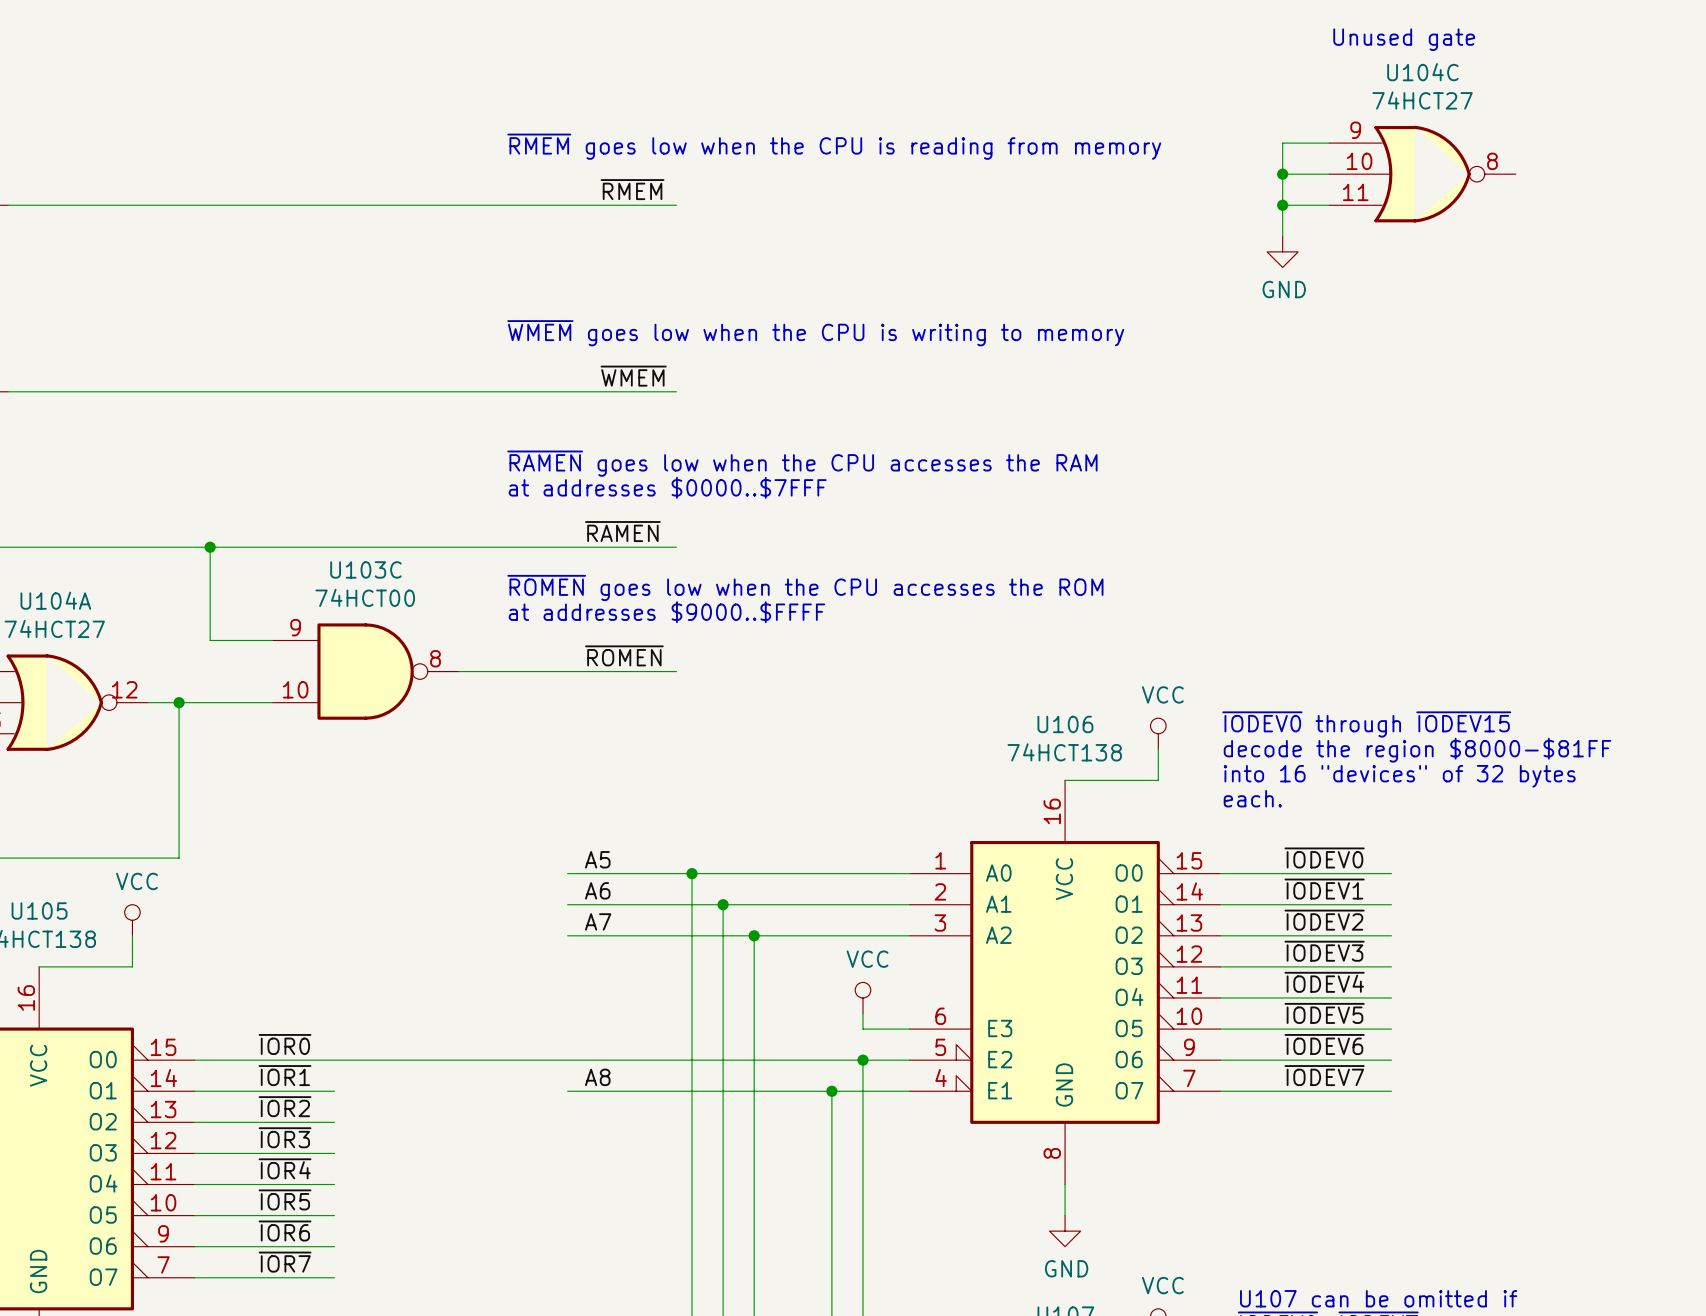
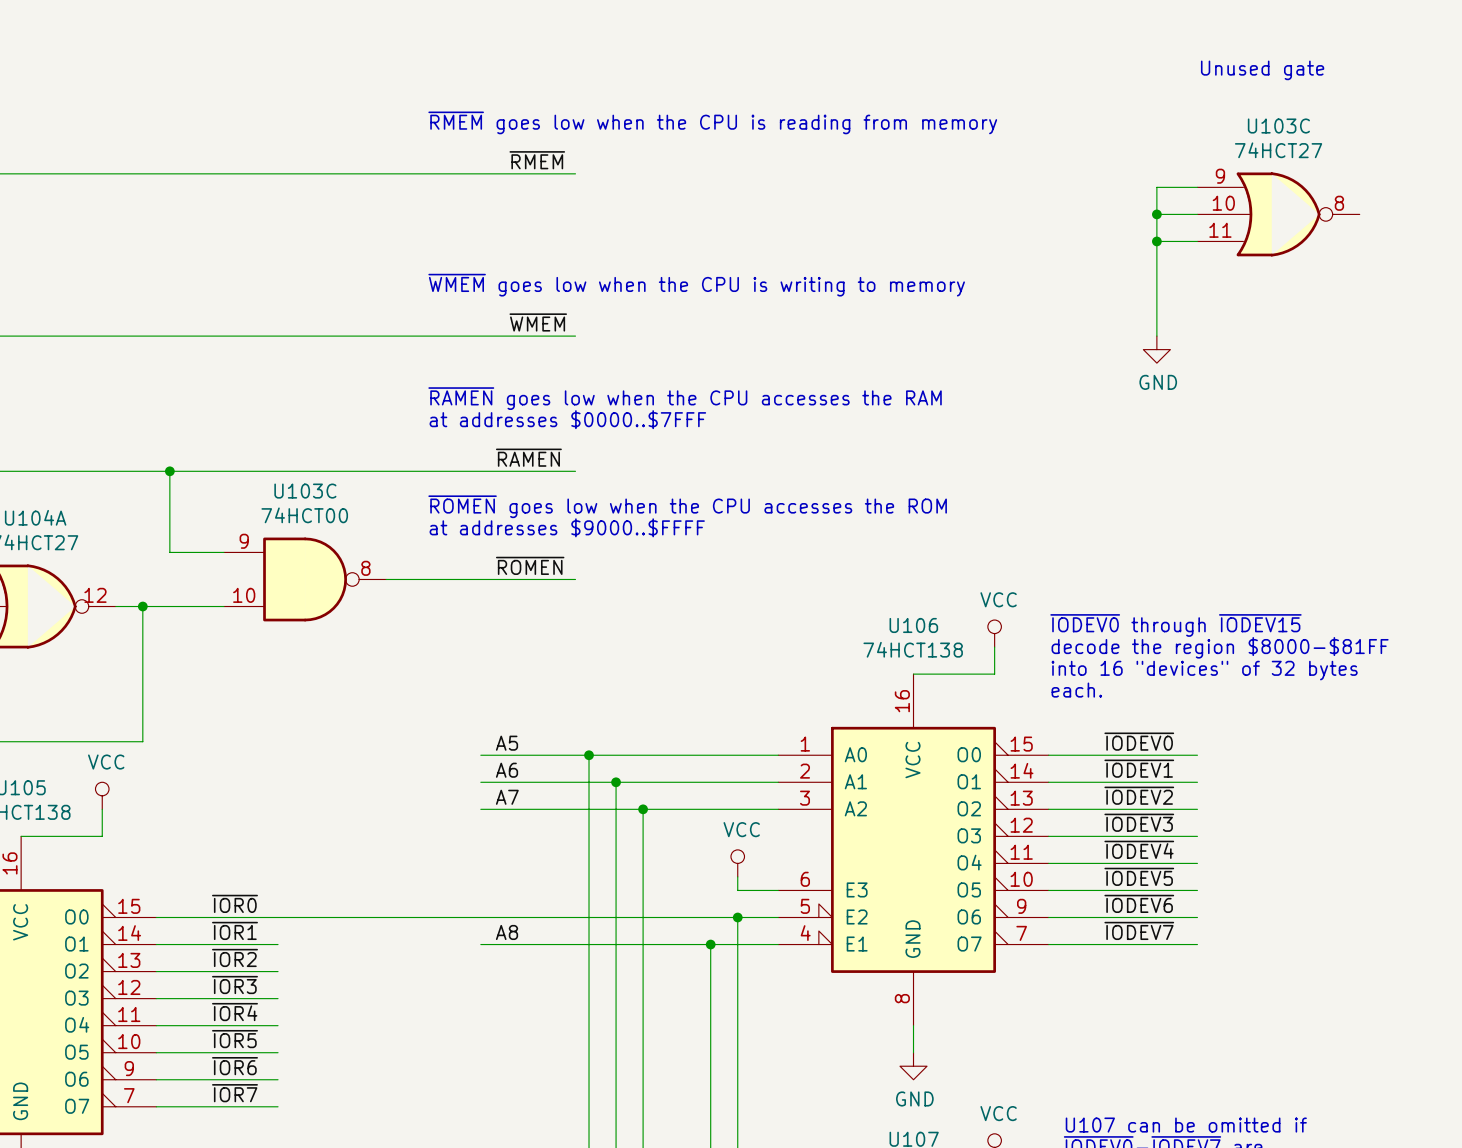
text position: Unused gate (1404, 39) -> Unused gate (1262, 70)
wire: (1329, 143) (1282, 143) (1282, 236) -> none
wire: (1282, 174) (1329, 174) -> (1156, 241) (1197, 241)
junction: (1282, 174) -> none
U104C: 74HCT27 (1422, 174) -> none
wire: (1282, 205) (1329, 205) -> (1156, 214) (1197, 214)
junction: (1282, 205) -> none
wire: none -> (1197, 187) (1156, 187) (1156, 336)
power symbol position: GND (1282, 251) -> GND (1156, 349)
junction: none -> (1156, 214)
U103C: none -> 74HCT27 (1278, 214)
junction: none -> (1156, 241)

